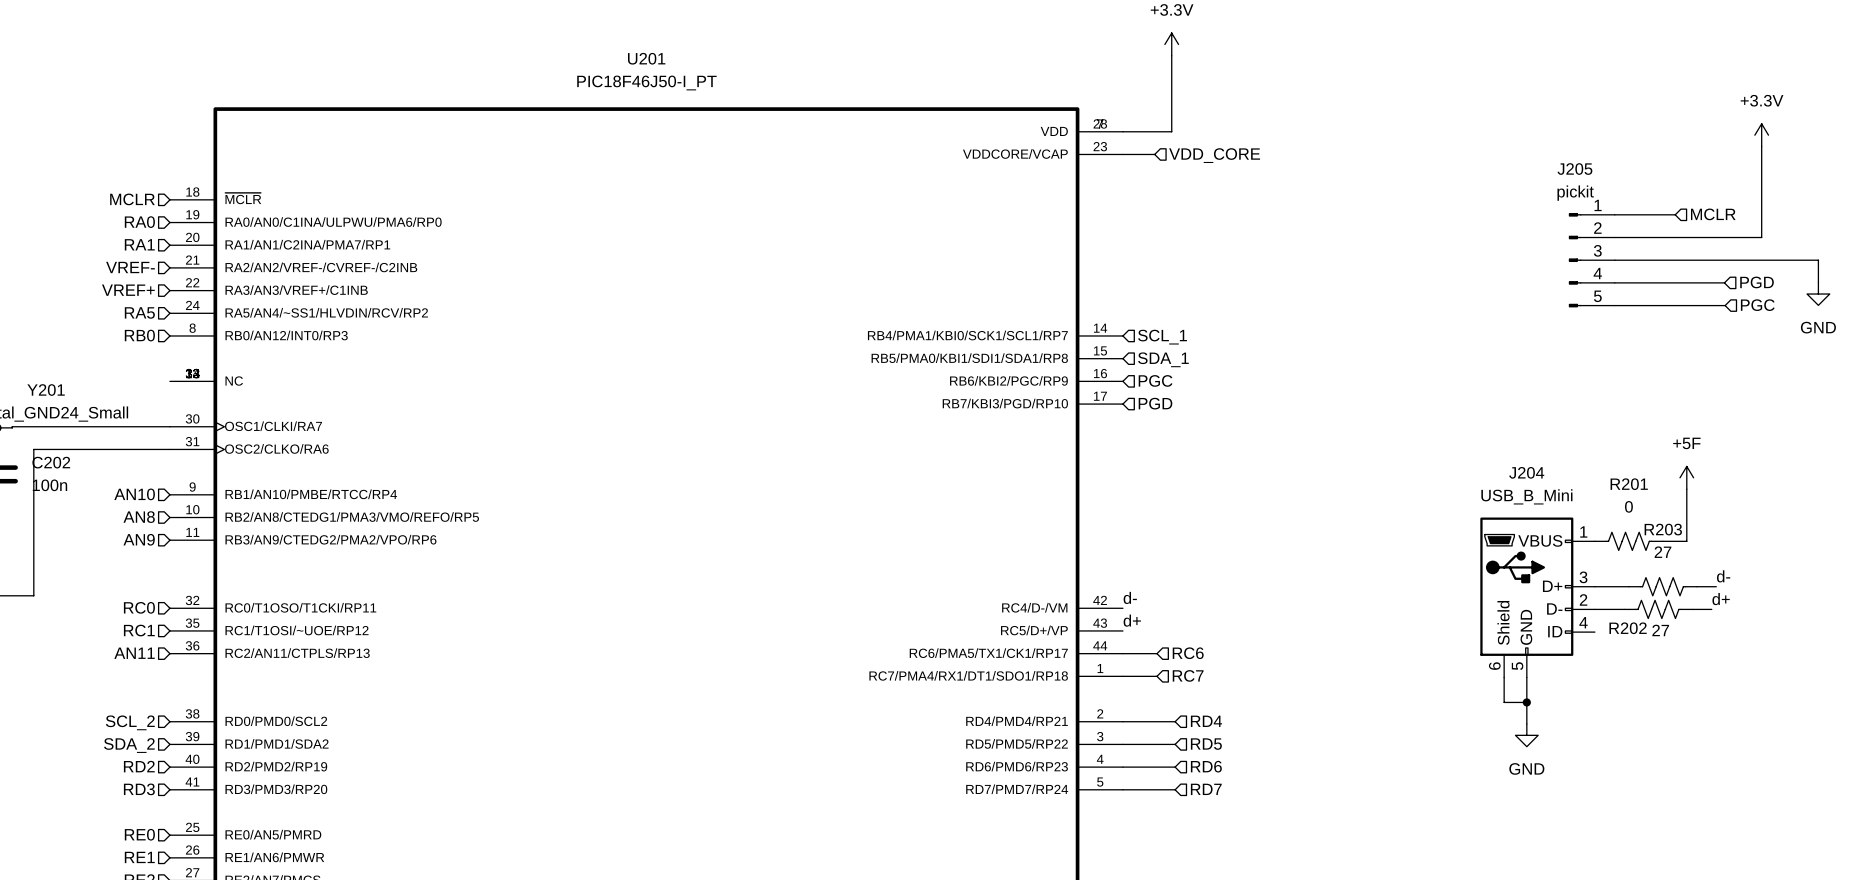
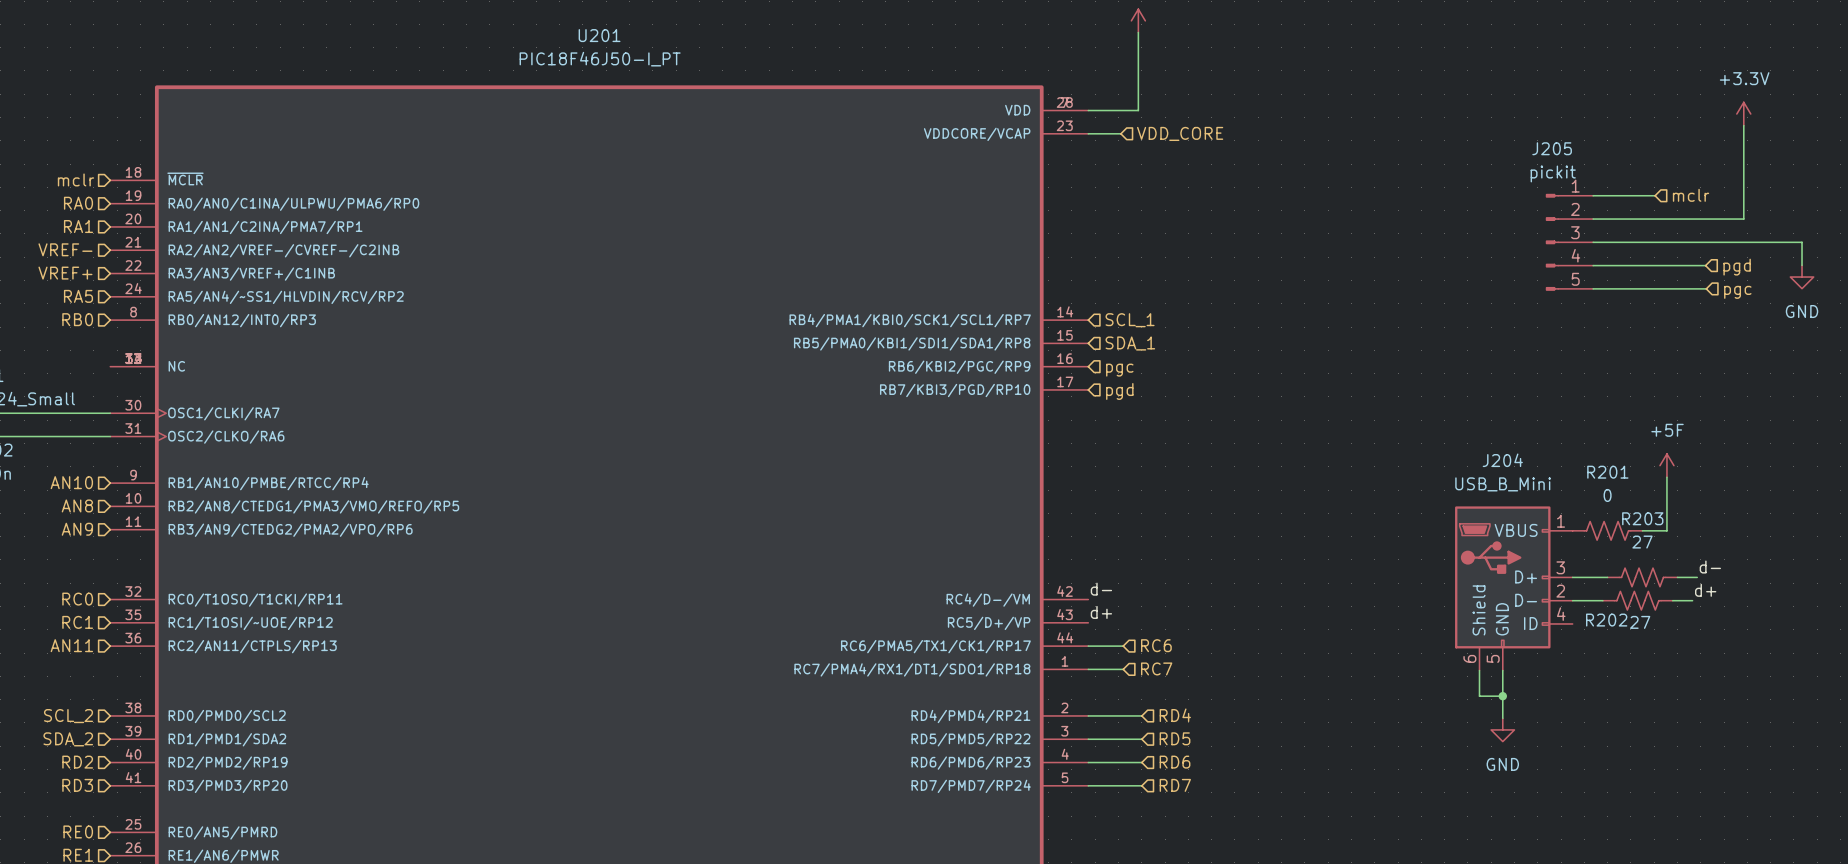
hierarchical label: MCLR (132, 199) -> mclr (75, 179)
hierarchical label: MCLR (1713, 214) -> mclr (1691, 195)
hierarchical label: PGD (1757, 282) -> pgd (1737, 267)
hierarchical label: PGC (1757, 305) -> pgc (1737, 292)
hierarchical label: PGC (1155, 380) -> pgc (1119, 370)
hierarchical label: PGD (1155, 403) -> pgd (1119, 391)

